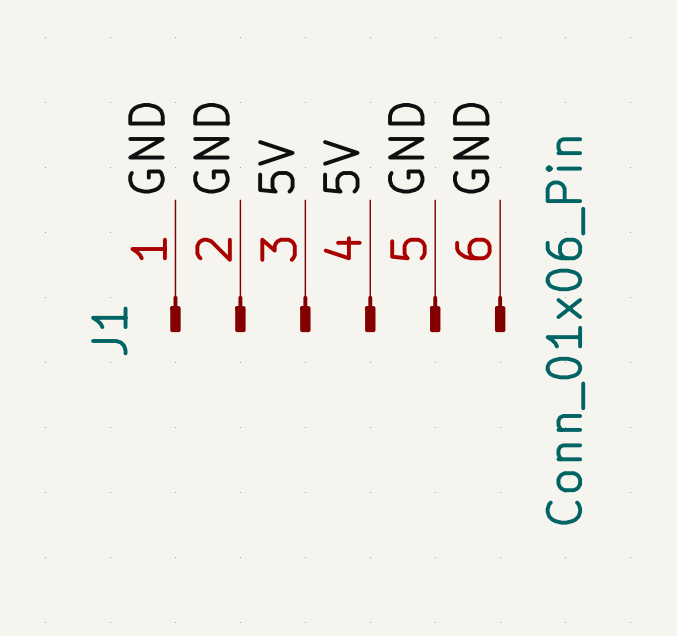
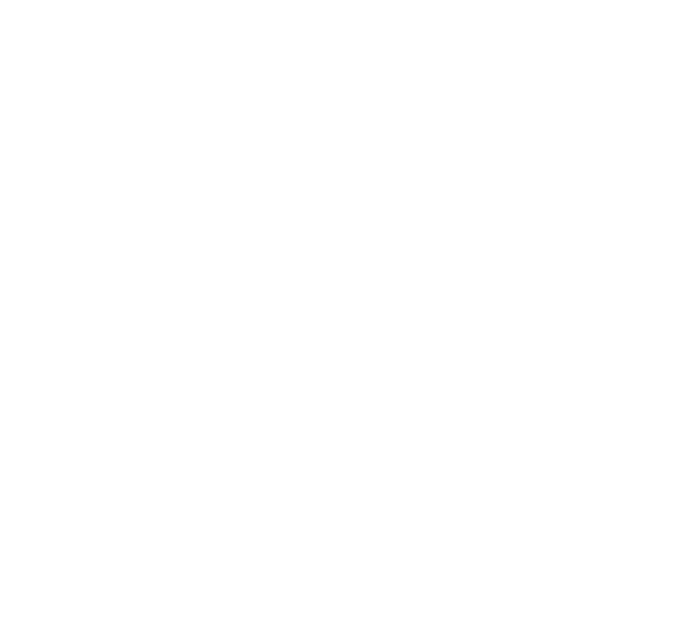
label: GND (146, 148) -> none
label: GND (211, 148) -> none
label: GND (406, 148) -> none
label: GND (471, 148) -> none
label: 5V (276, 166) -> none
label: 5V (341, 166) -> none
J1: Conn_01x06_Pin (337, 266) -> none

